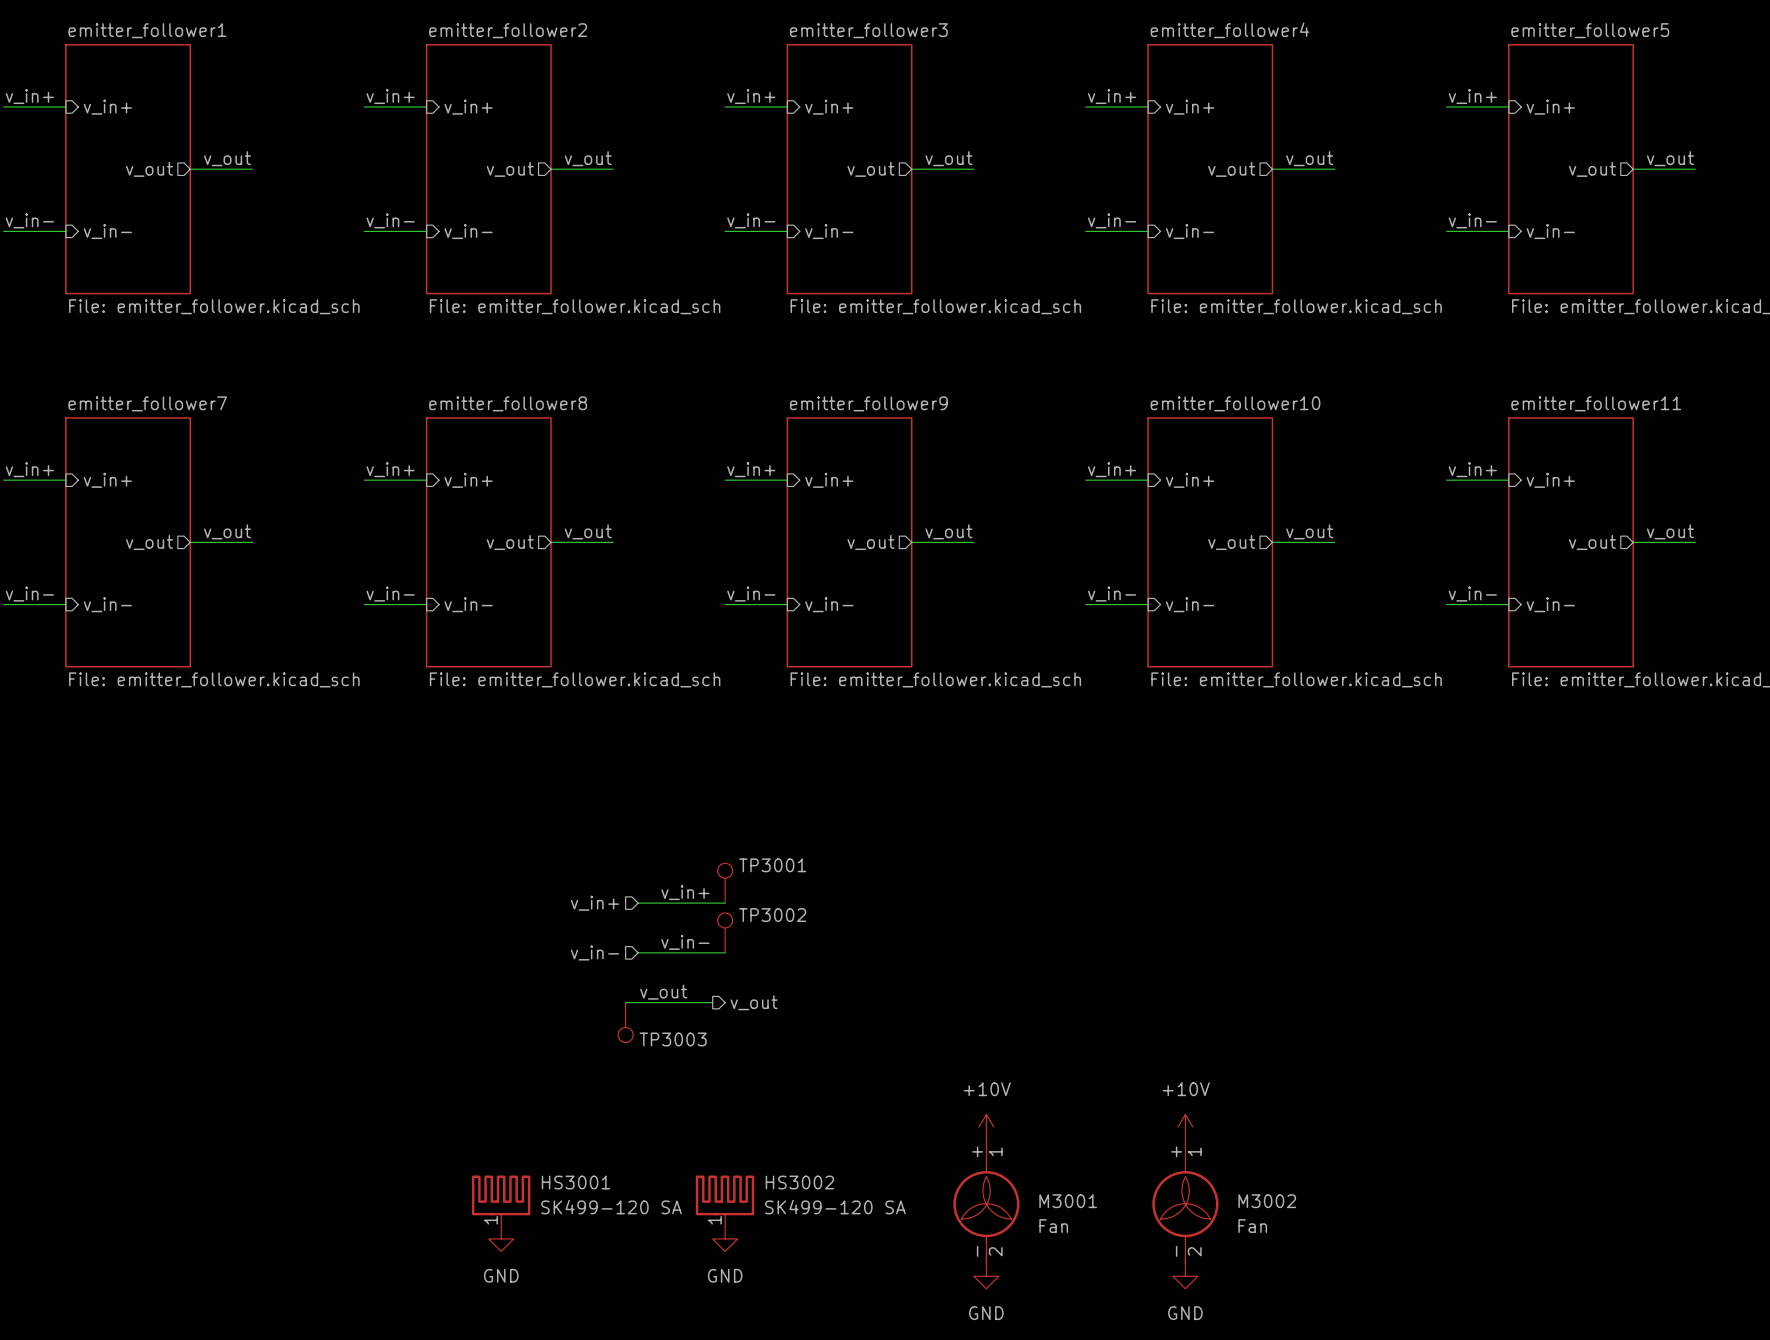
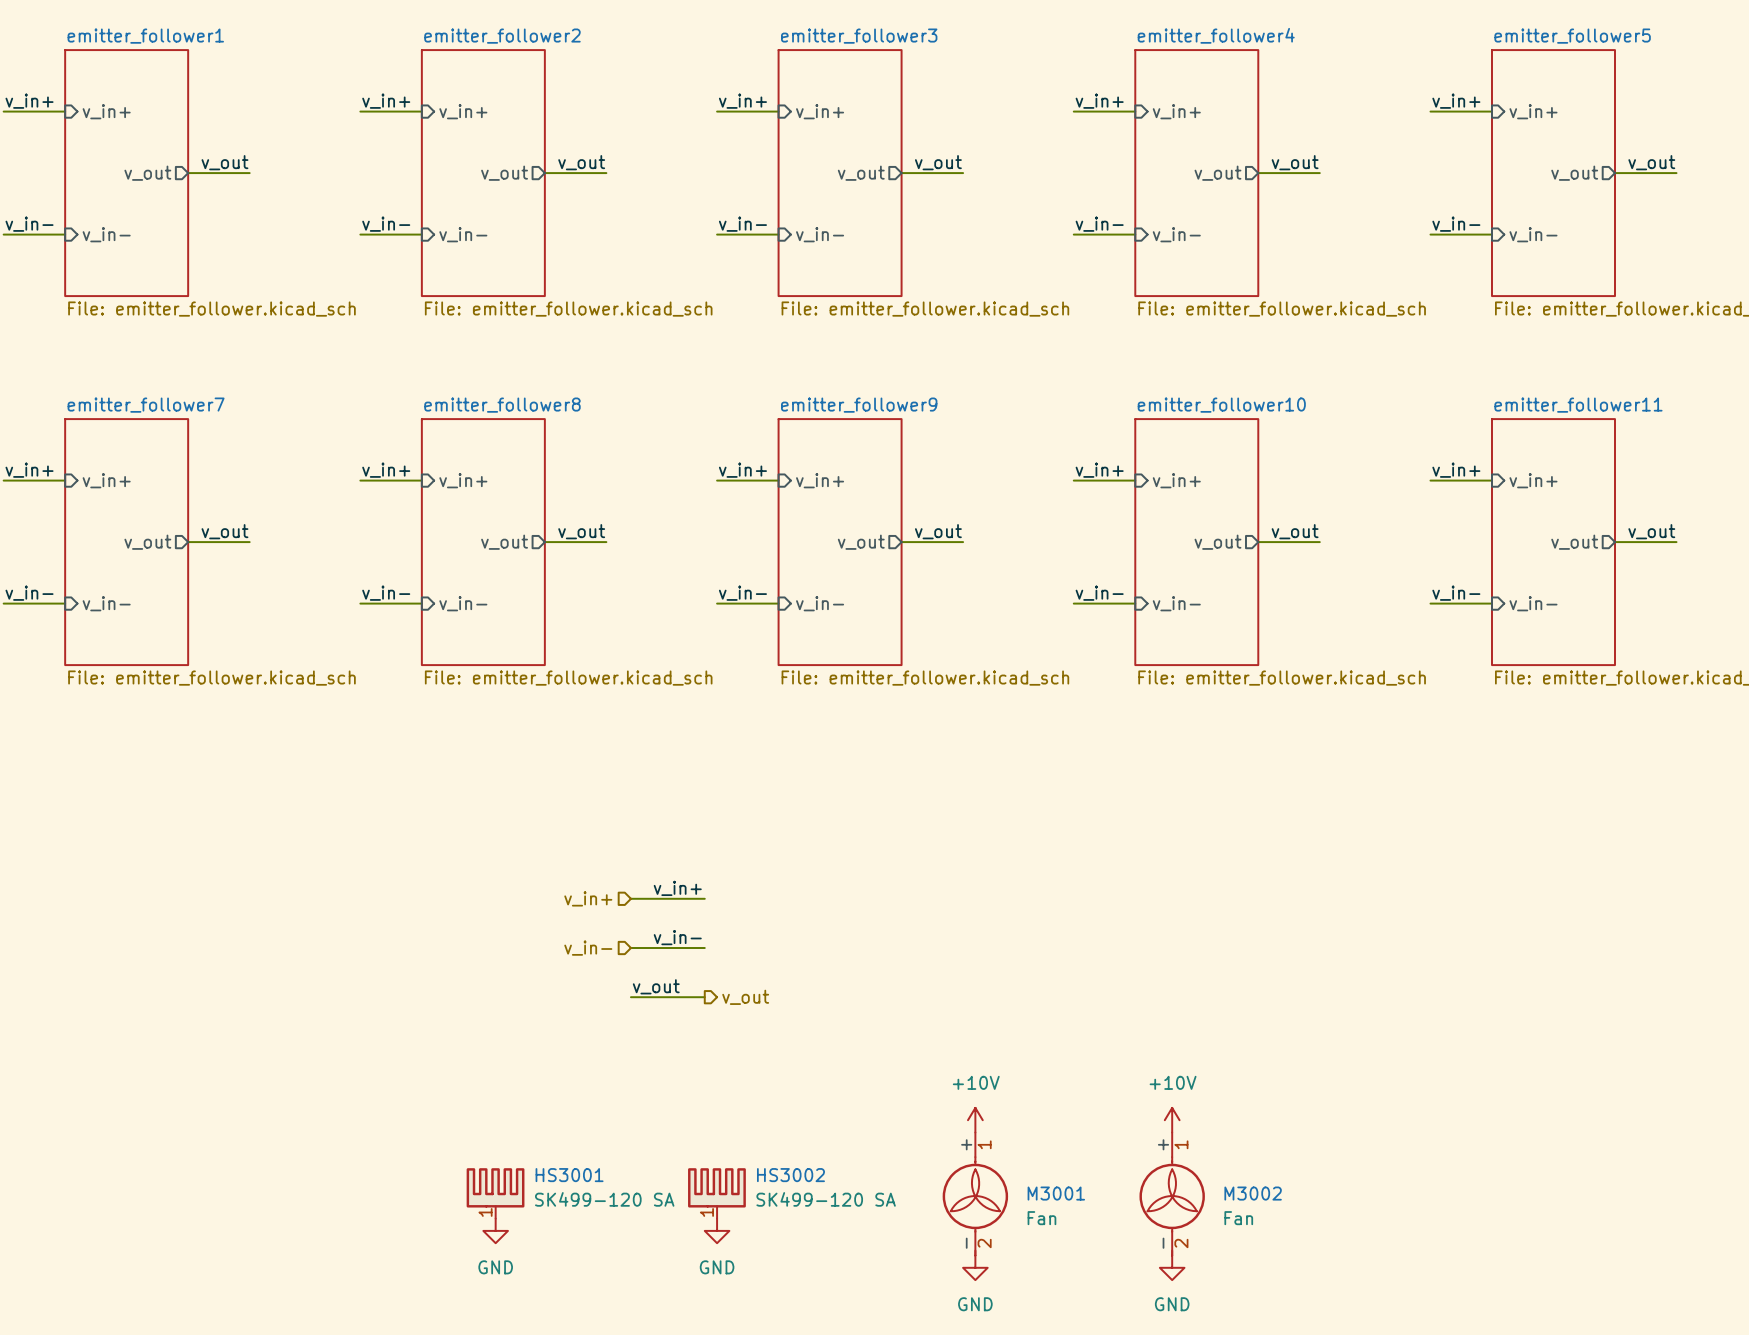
TP3001: (725, 883) -> none
wire: (712, 903) (725, 903) -> none
TP3002: (725, 932) -> none
wire: (712, 952) (725, 952) -> none
wire: (625, 1002) (638, 1002) -> none
TP3003: (625, 1022) -> none

